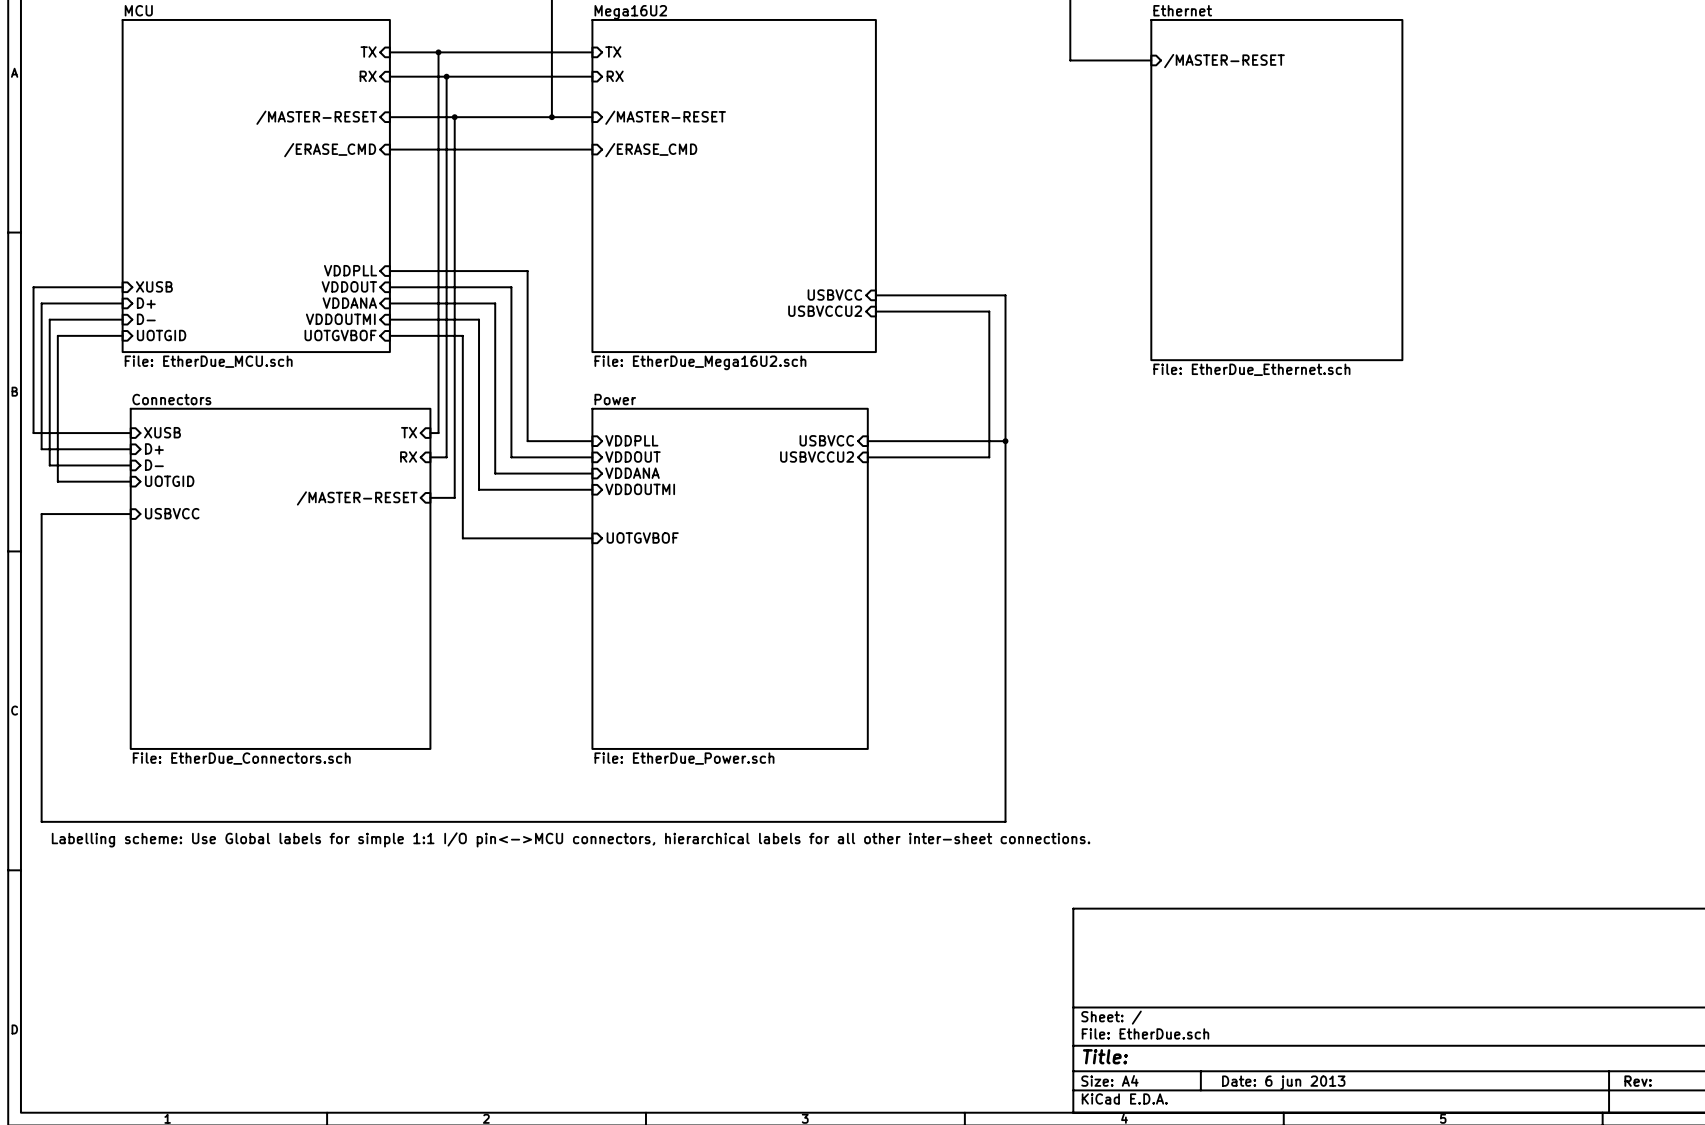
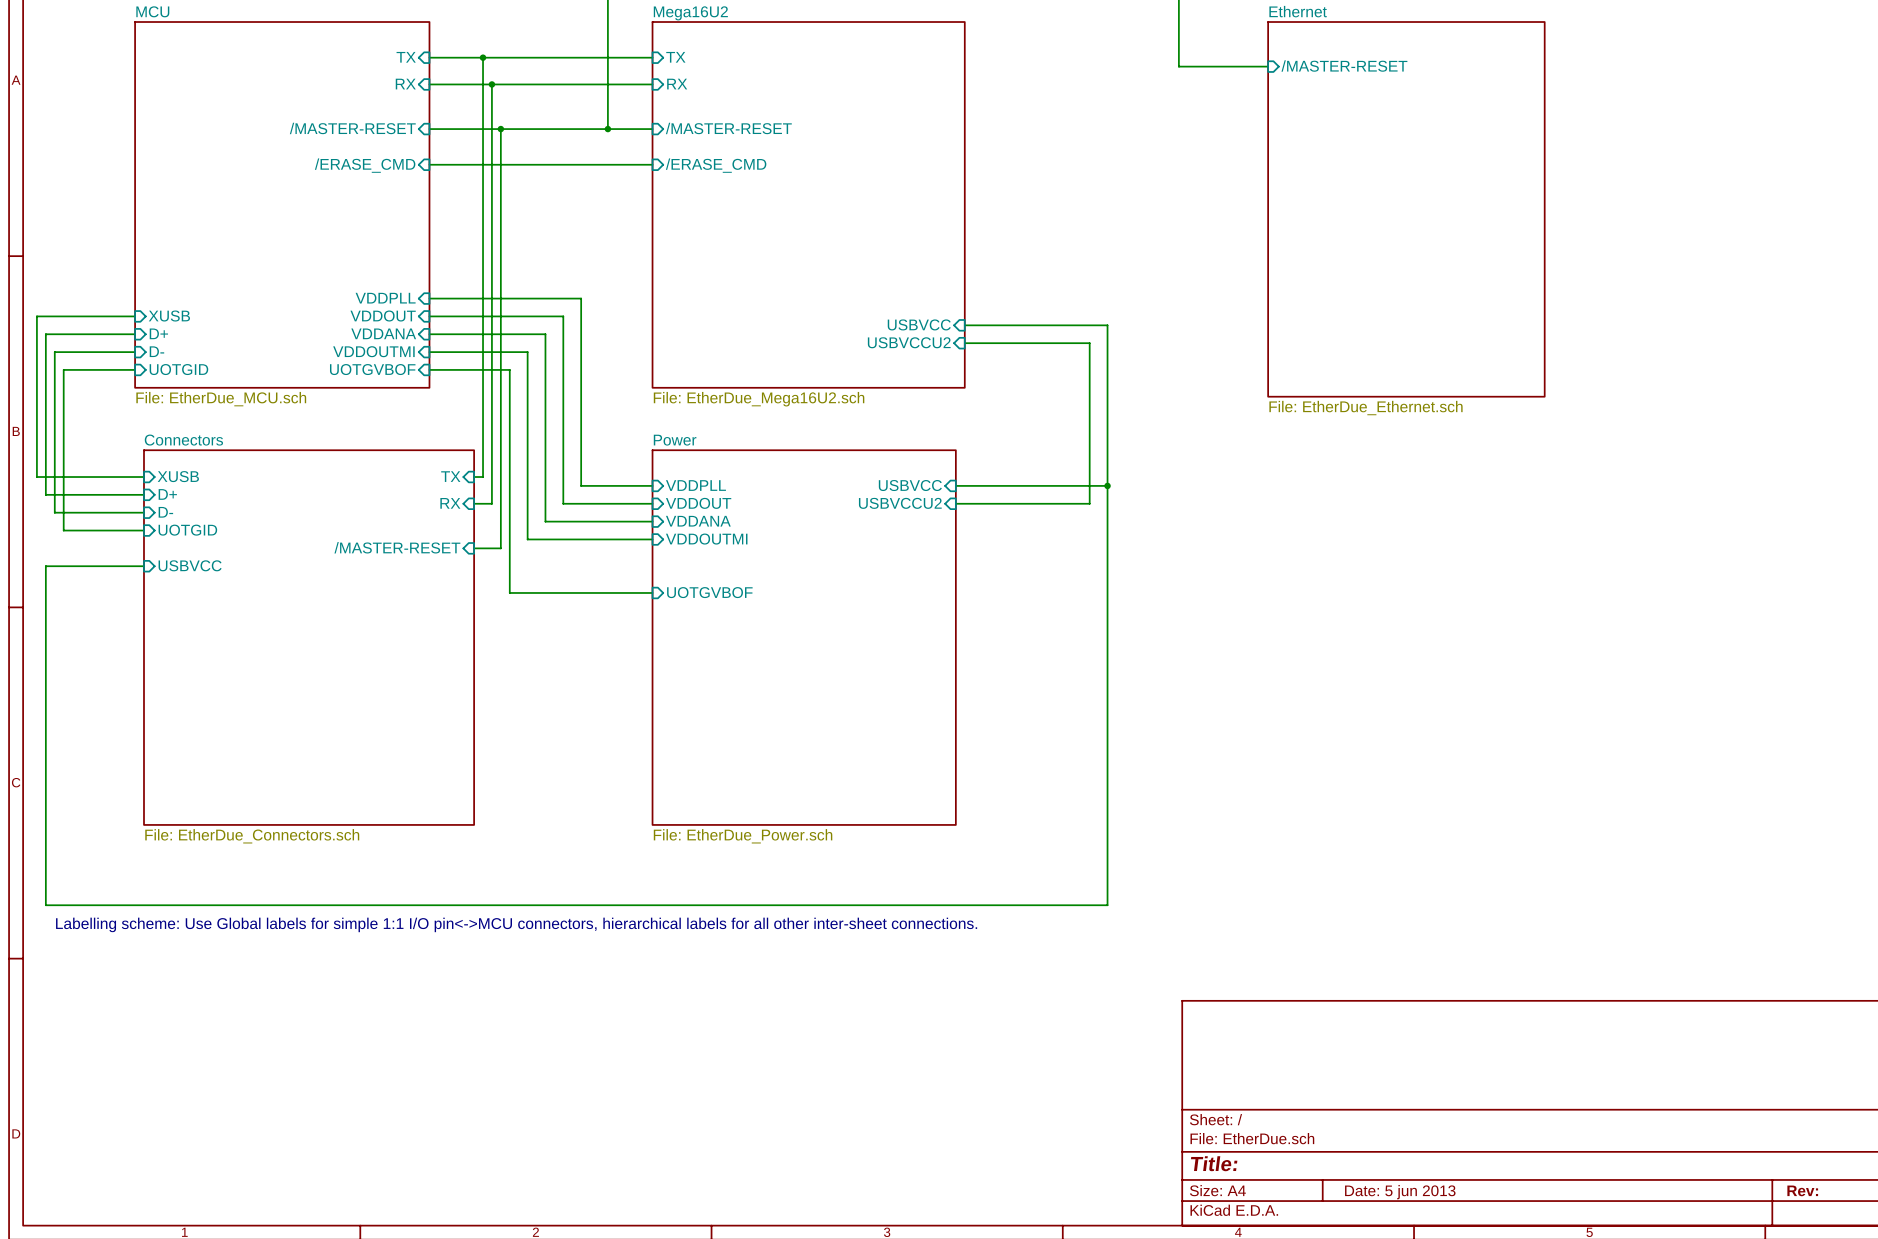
title block: Date: 6 jun 2013 (1283, 1082) -> Date: 5 jun 2013 (1400, 1192)

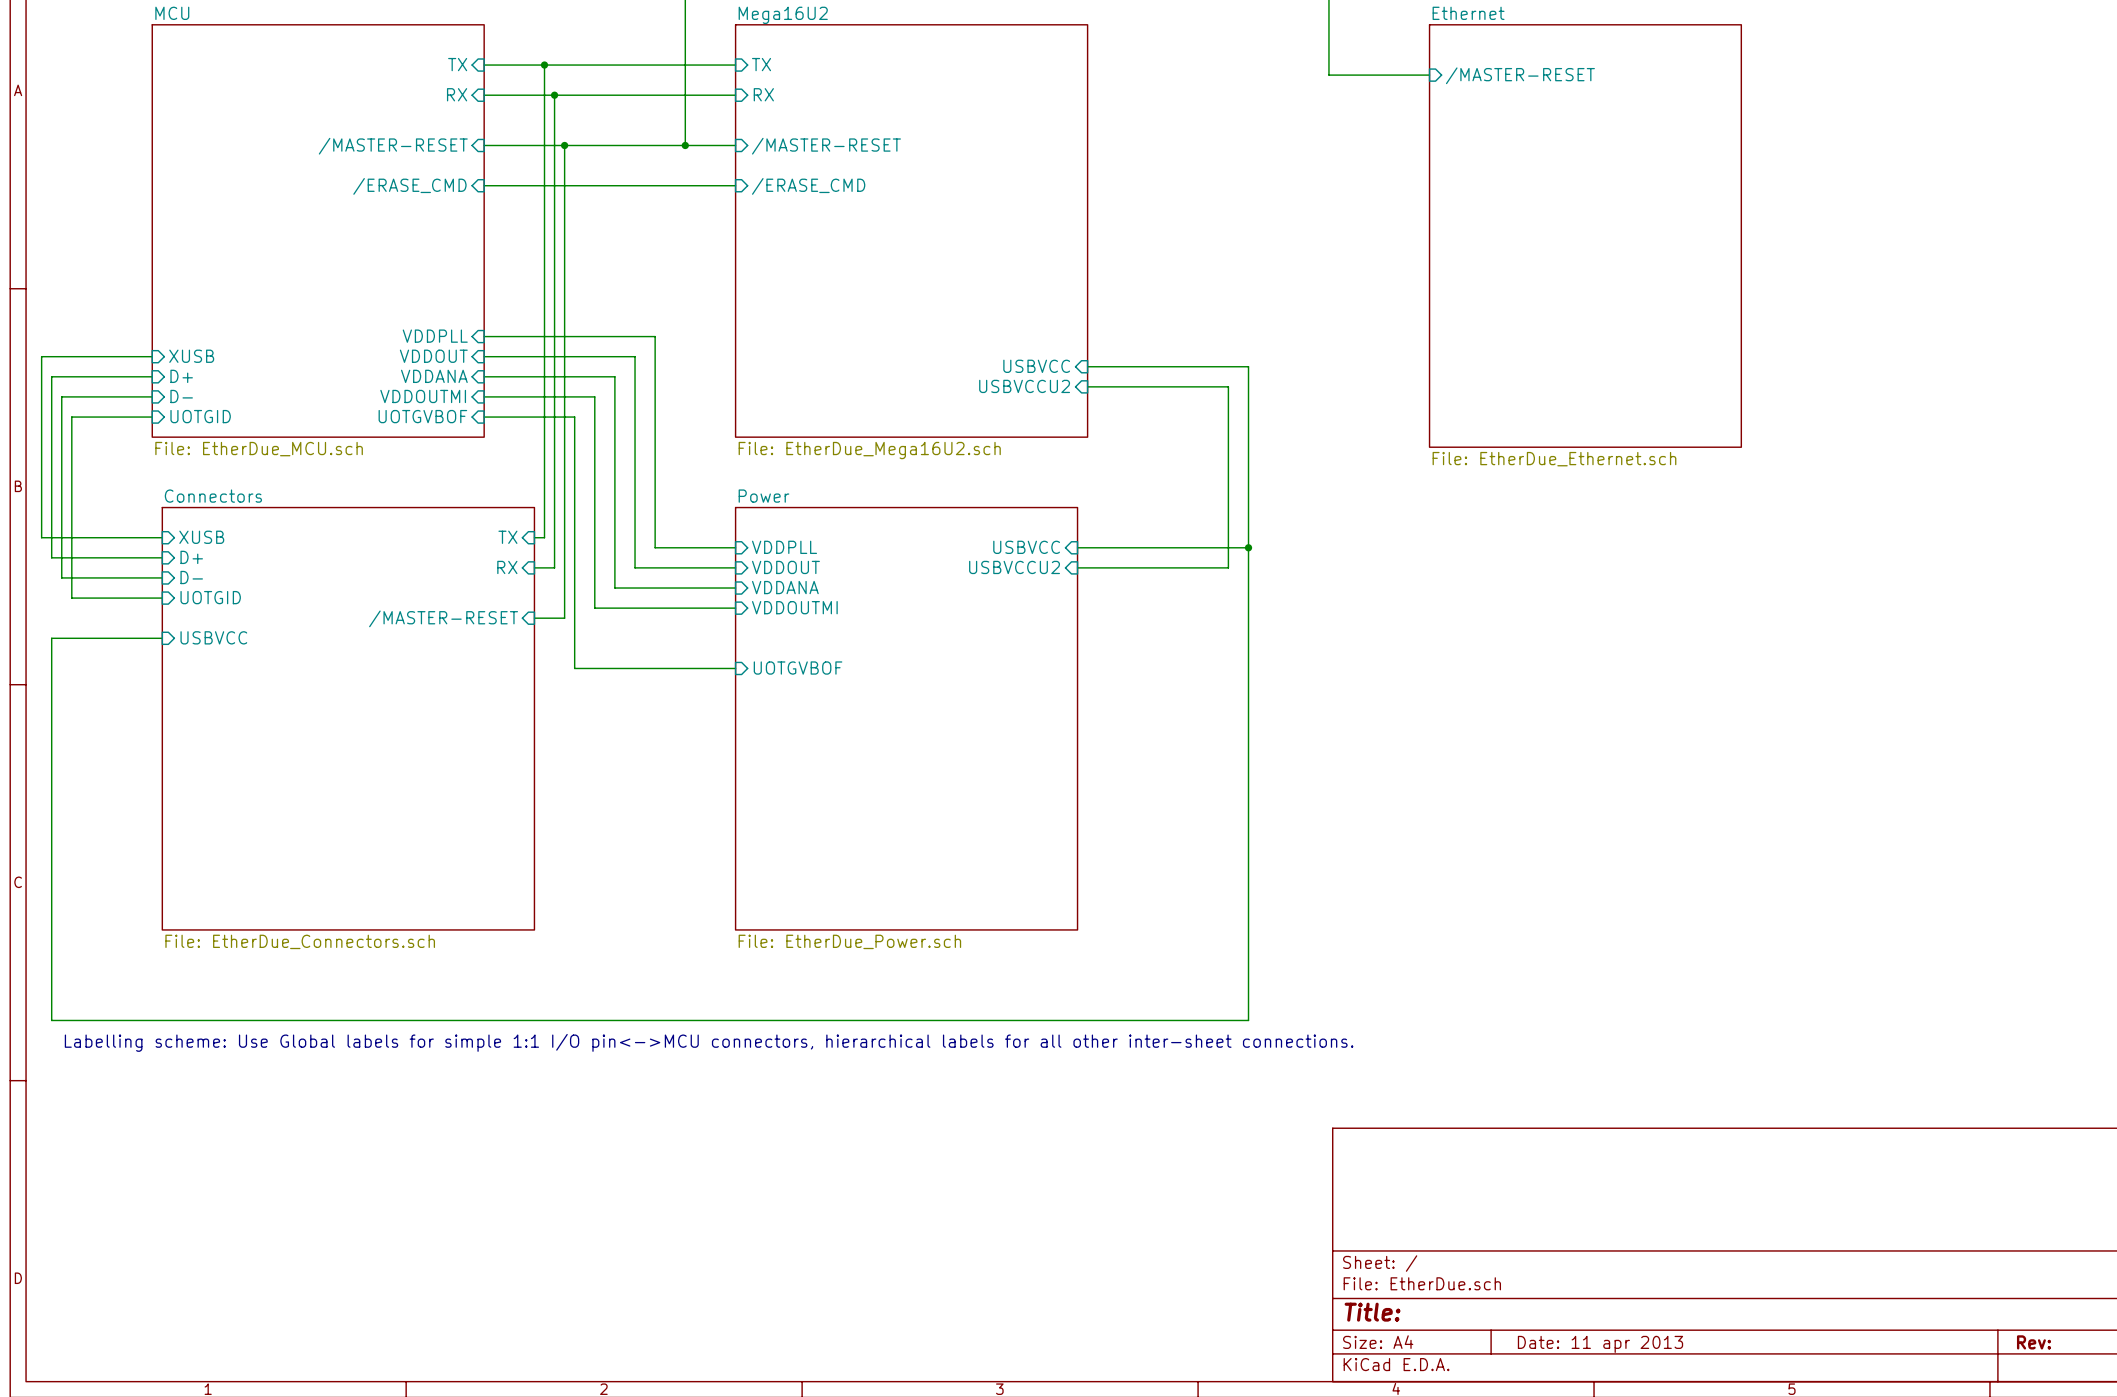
title block: Date: 5 jun 2013 (1400, 1192) -> Date: 11 apr 2013 (1600, 1344)

